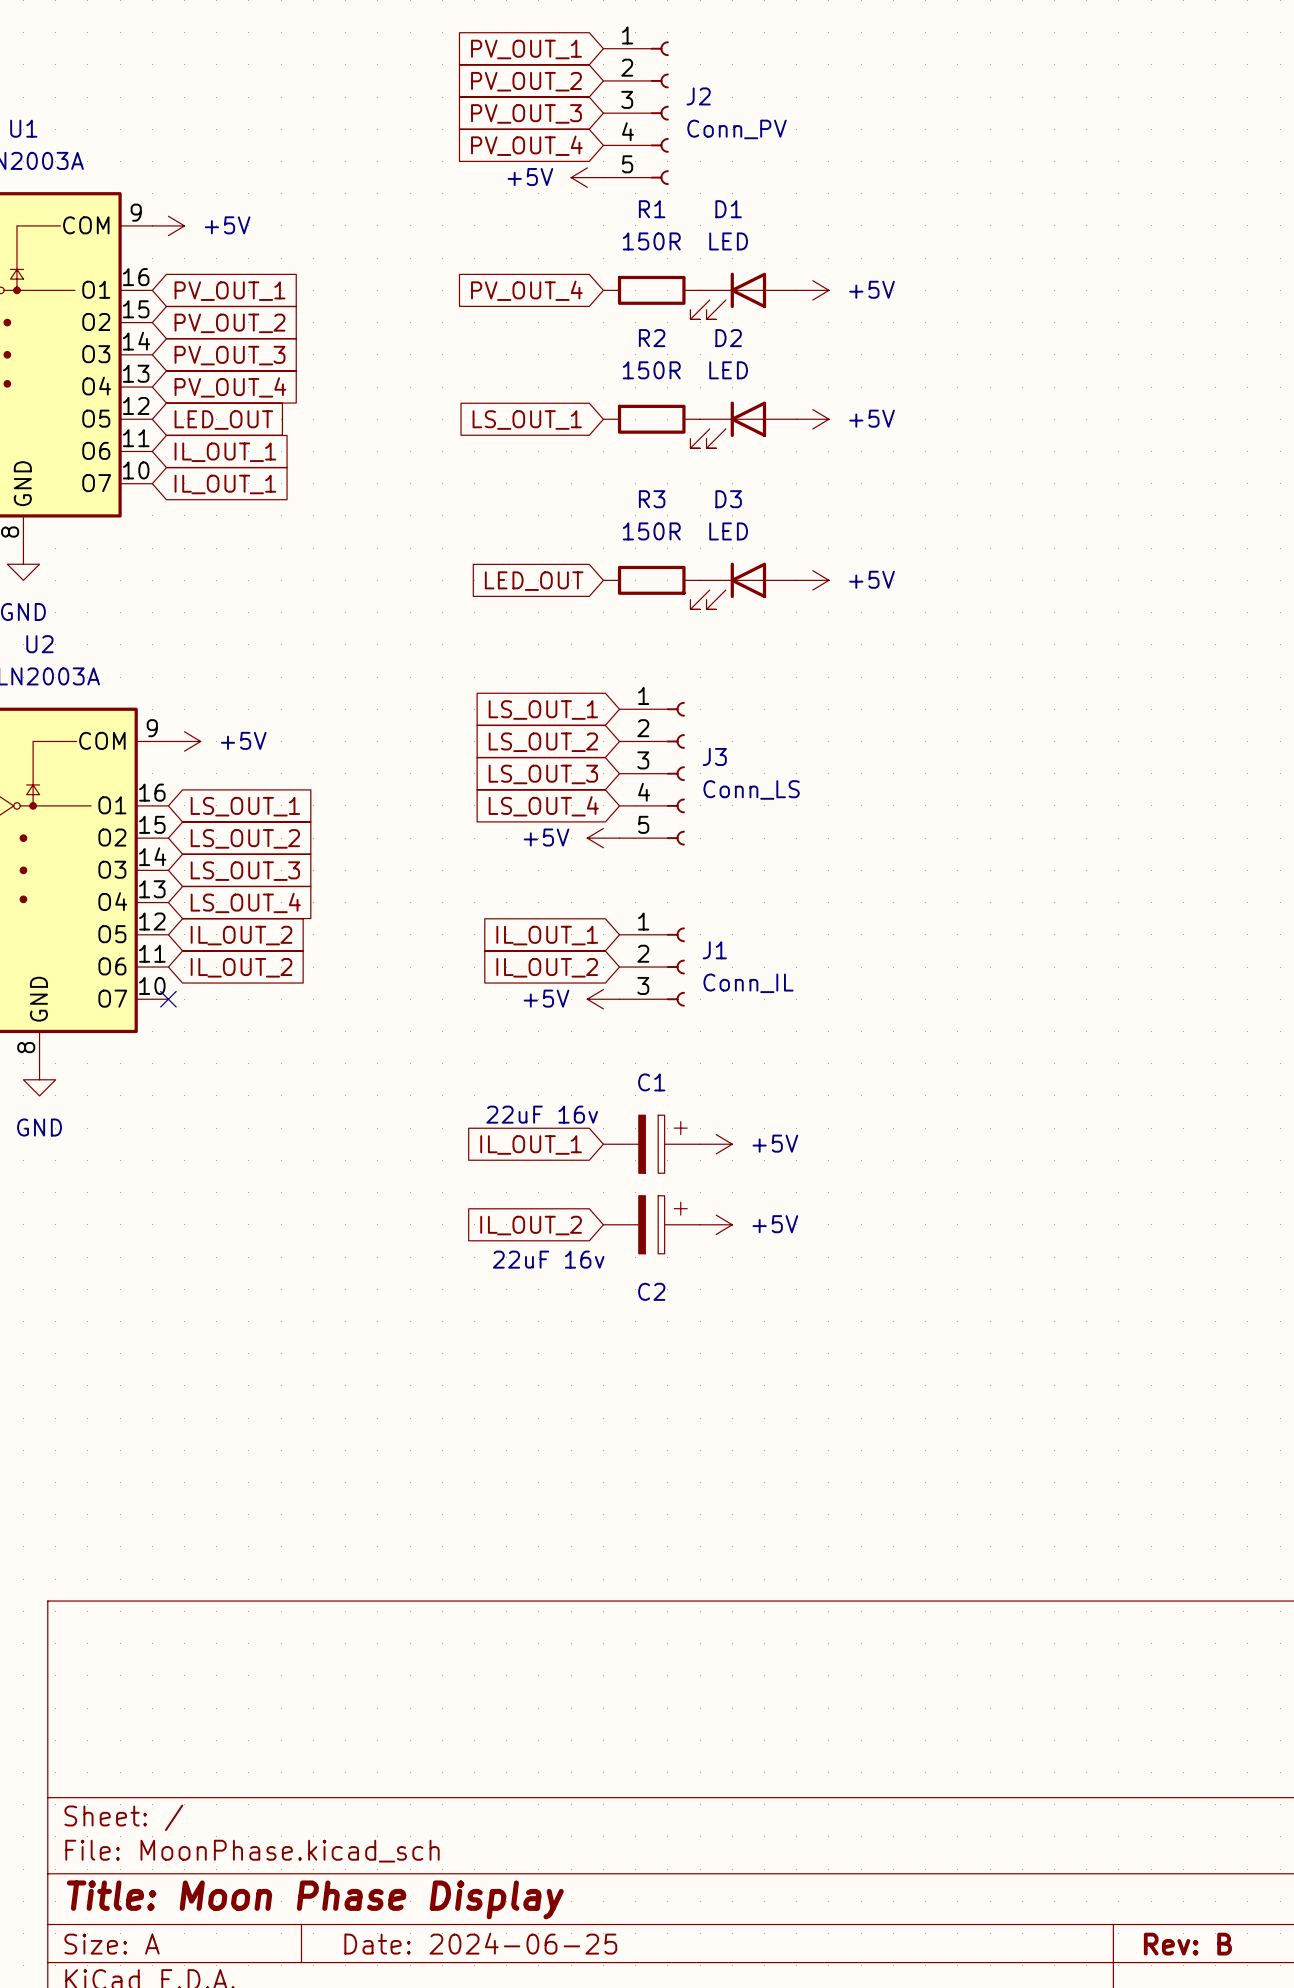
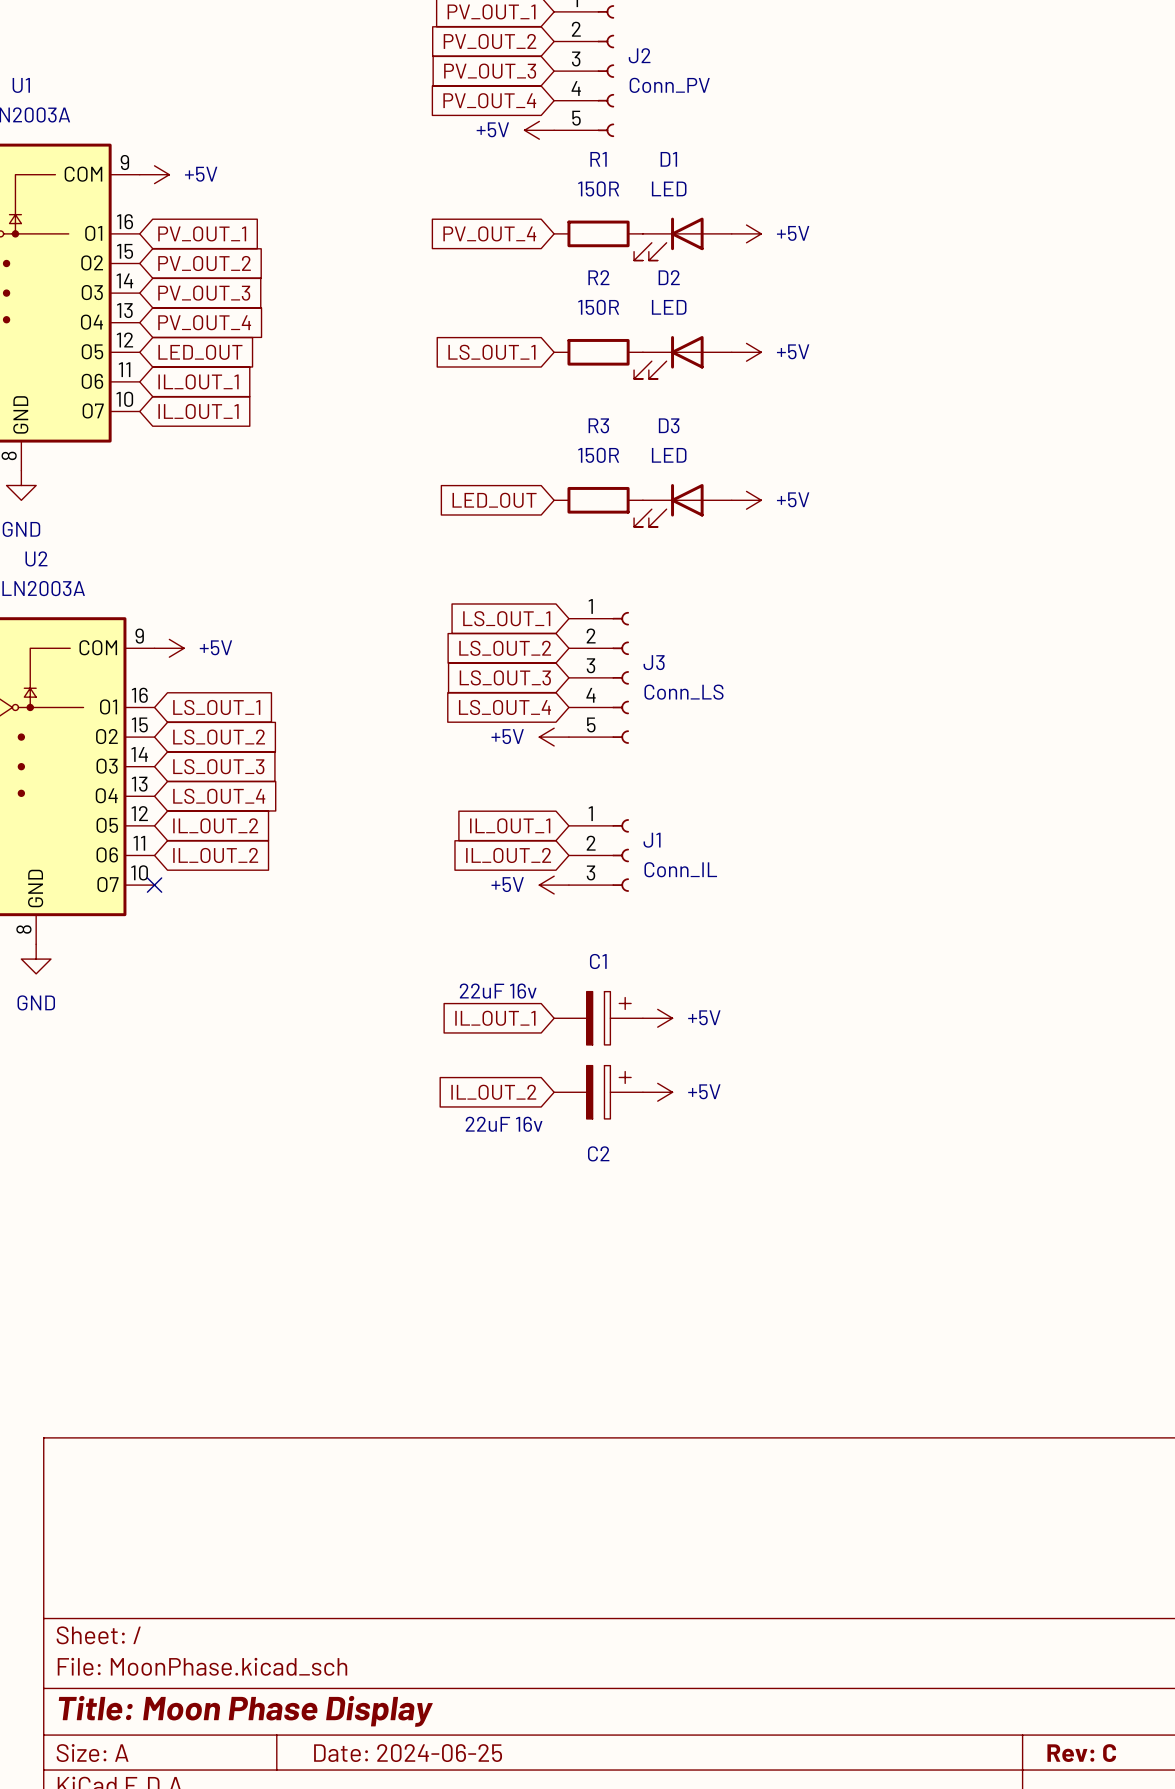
title block: Rev: B (1187, 1944) -> Rev: C (1081, 1753)

